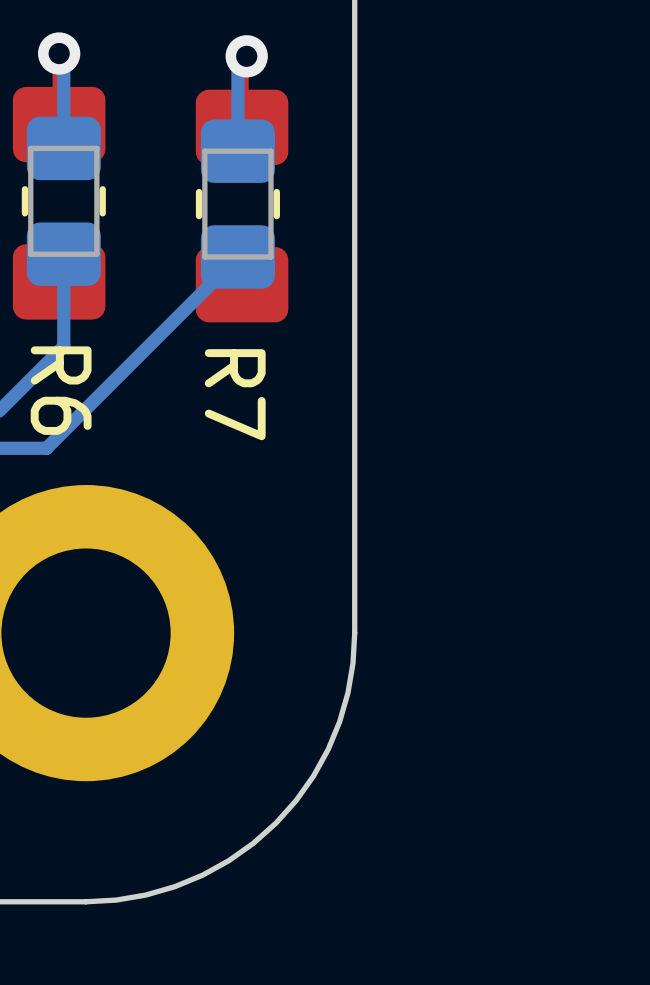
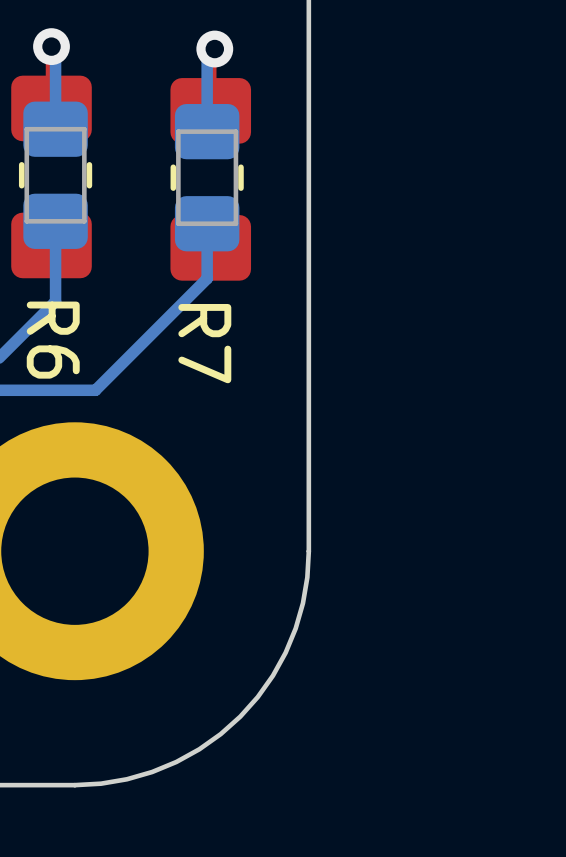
bottom track: (237, 256) (46, 448) -> (207, 223) (207, 278) (95, 390) (40, 390)

